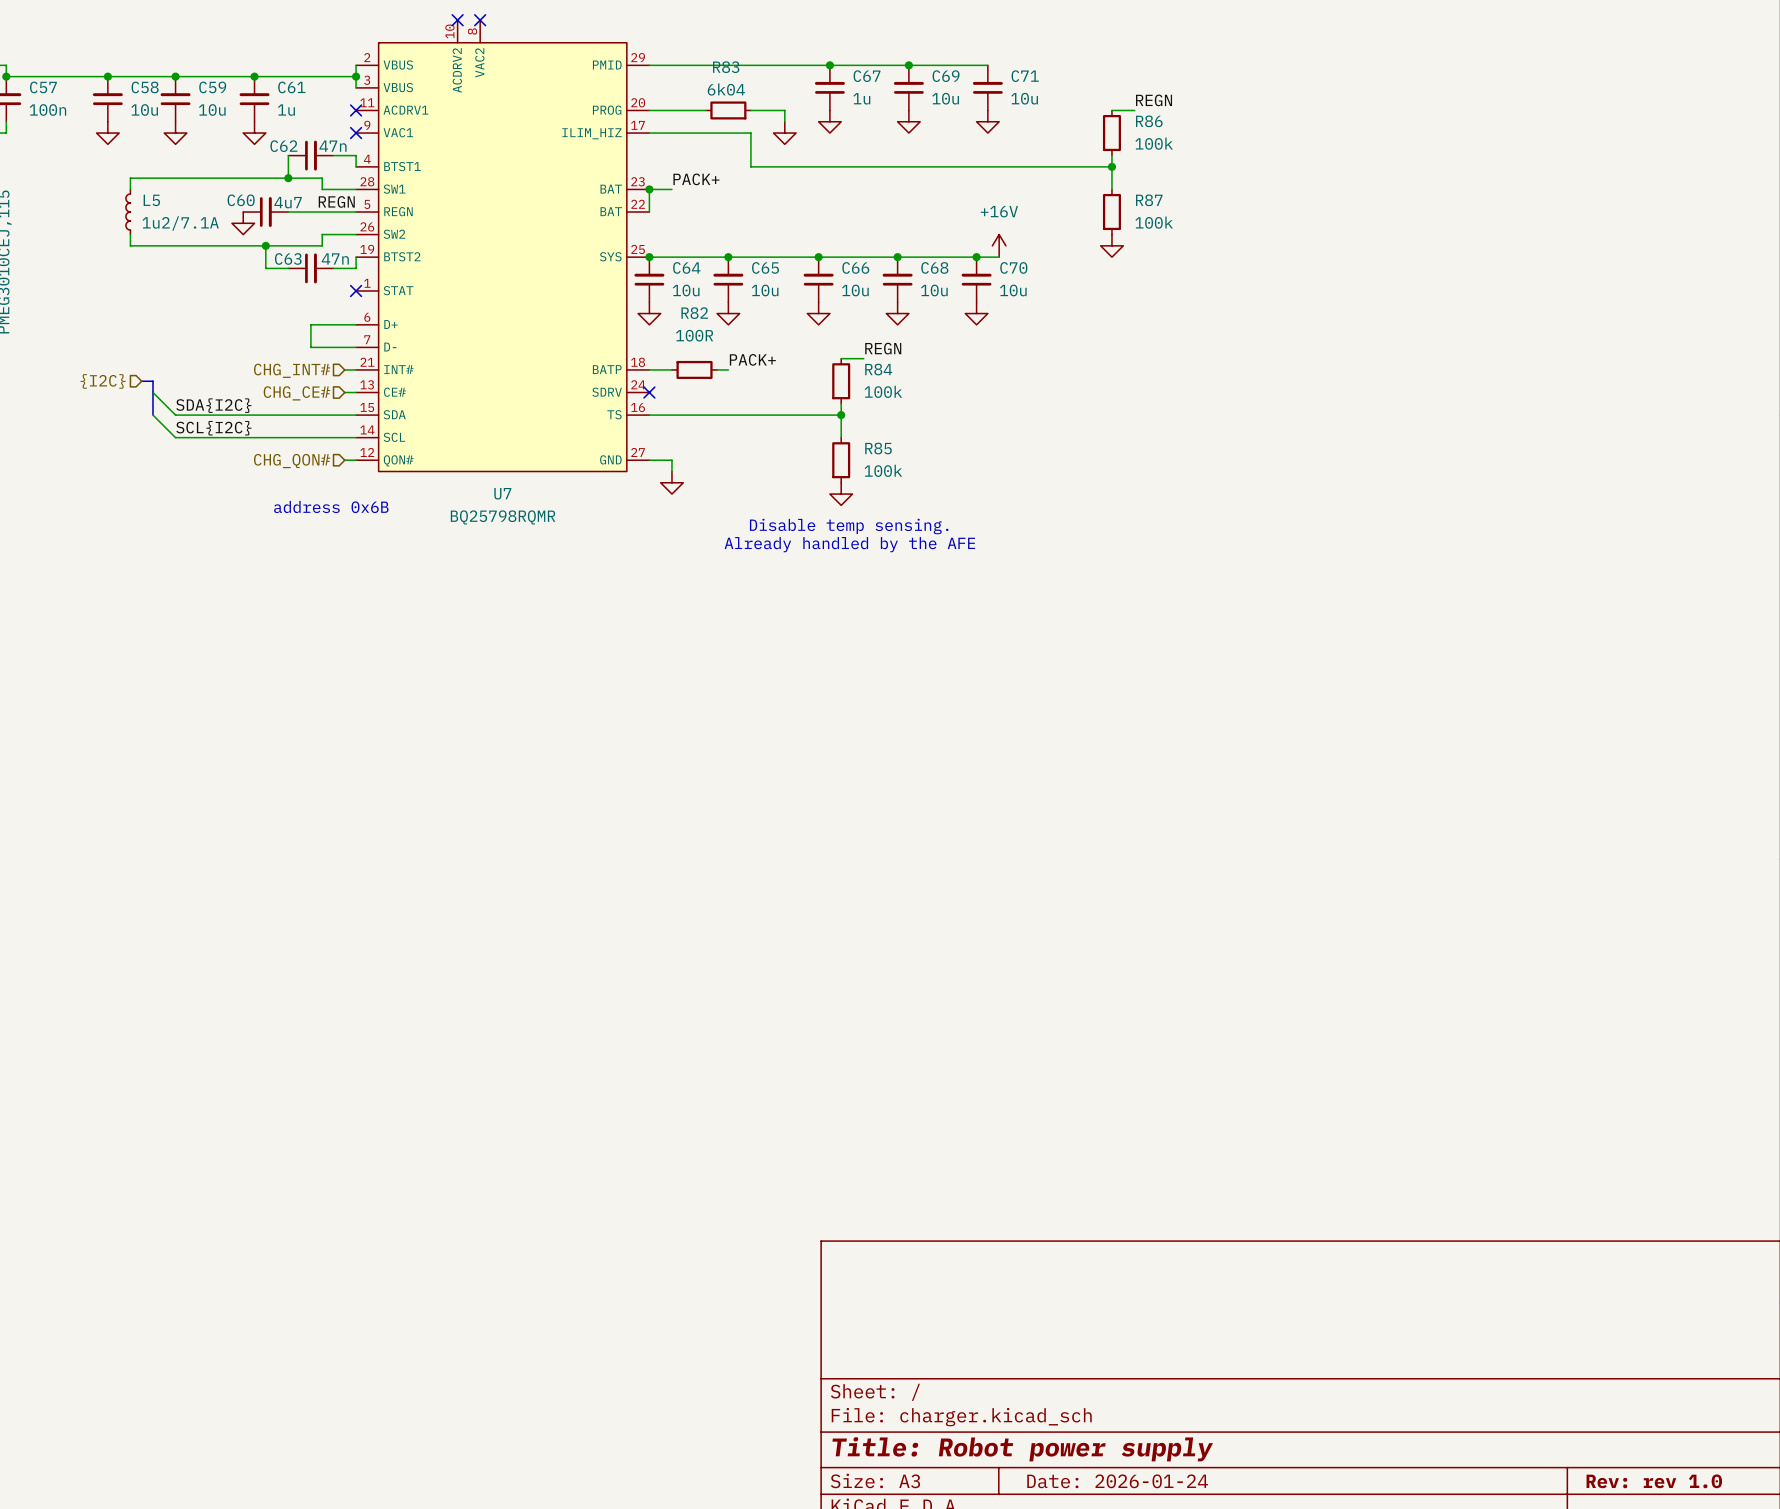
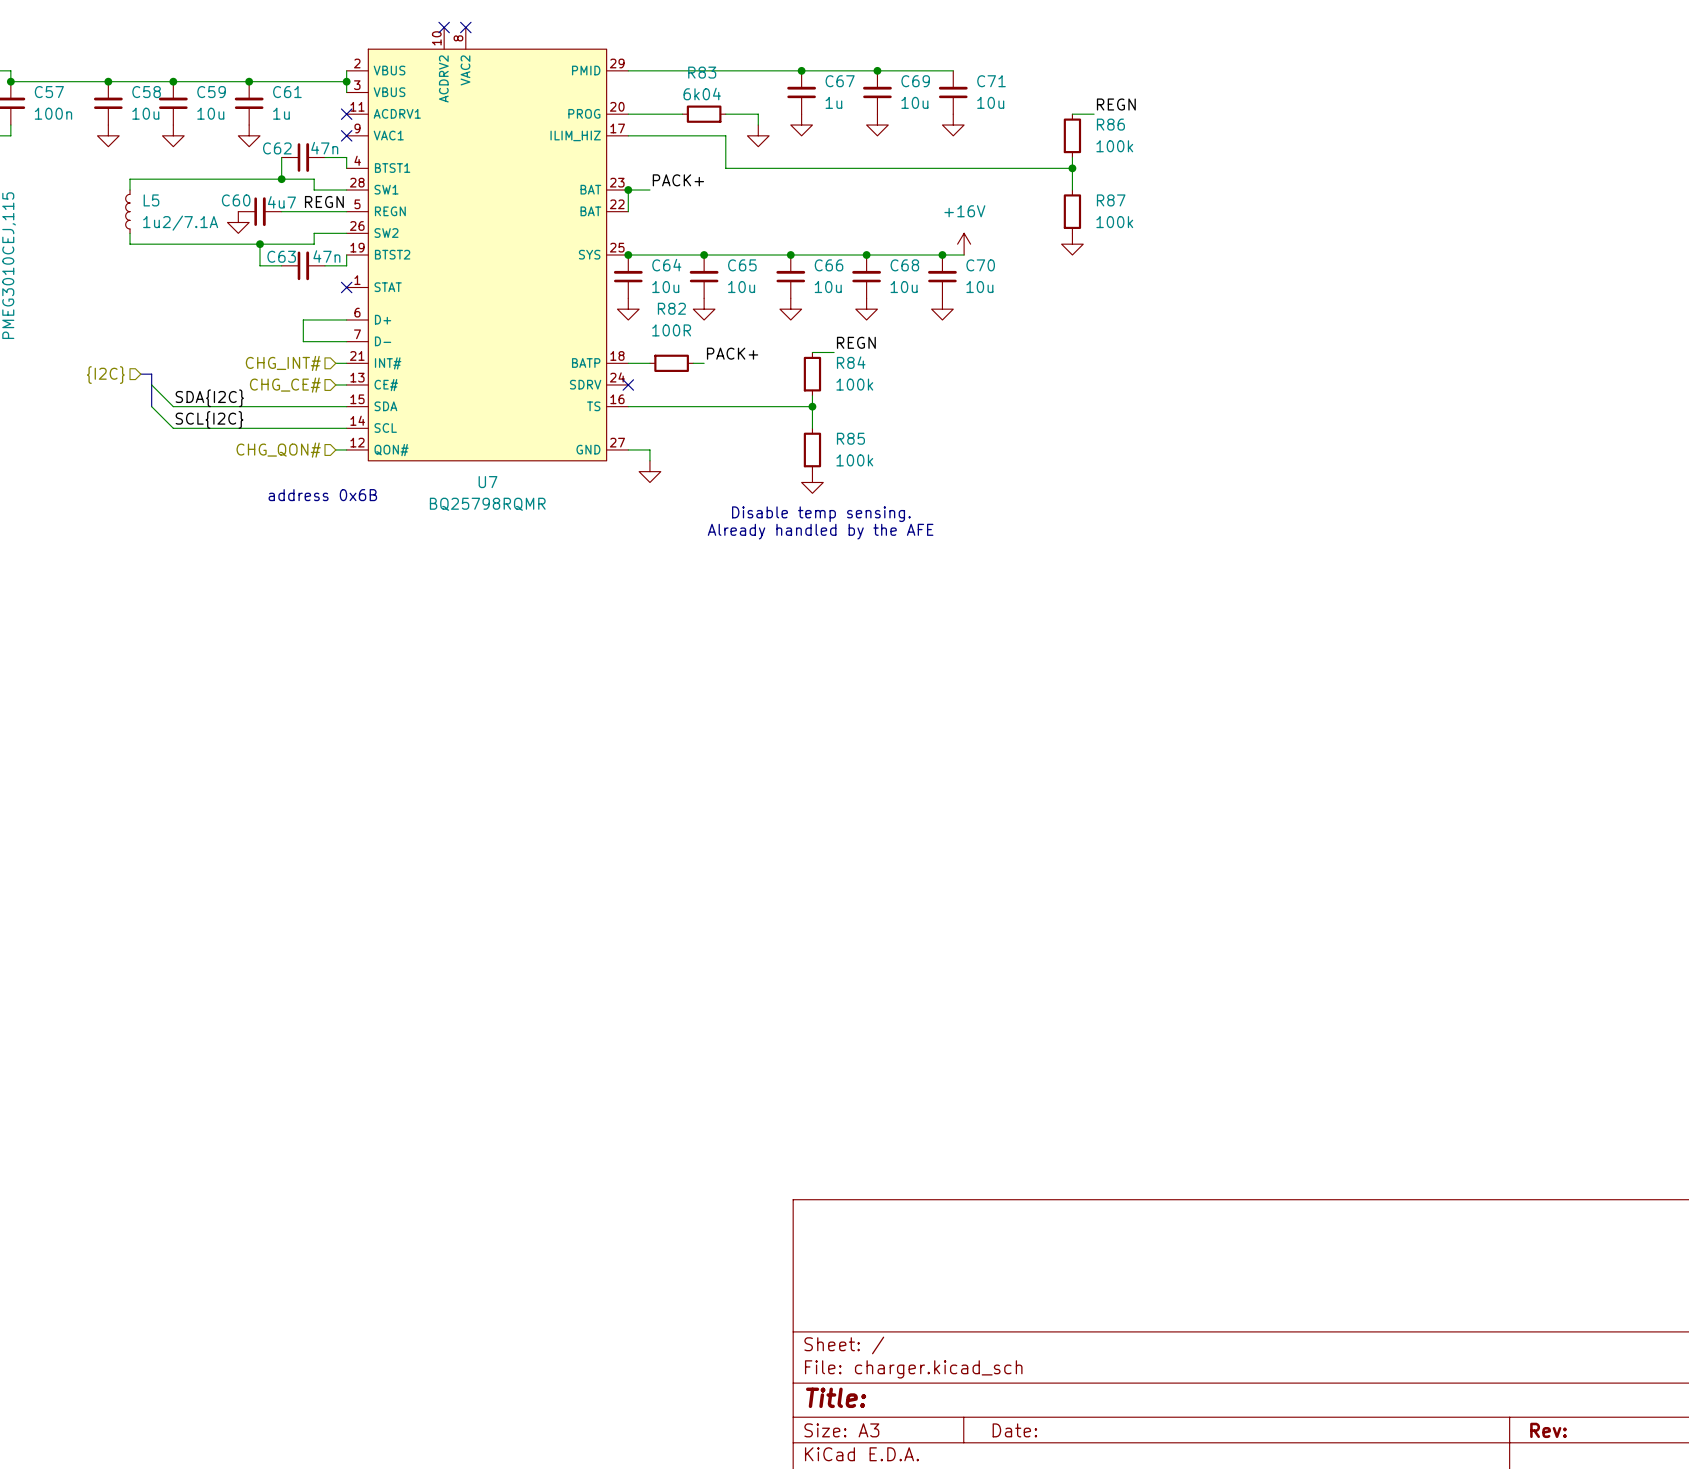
title block: Title: Robot power supply (1022, 1449) -> Title: (836, 1397)
title block: Date: 2026-01-24 (1117, 1481) -> Date: (1014, 1430)
title block: Rev: rev 1.0 (1654, 1481) -> Rev: (1548, 1430)

